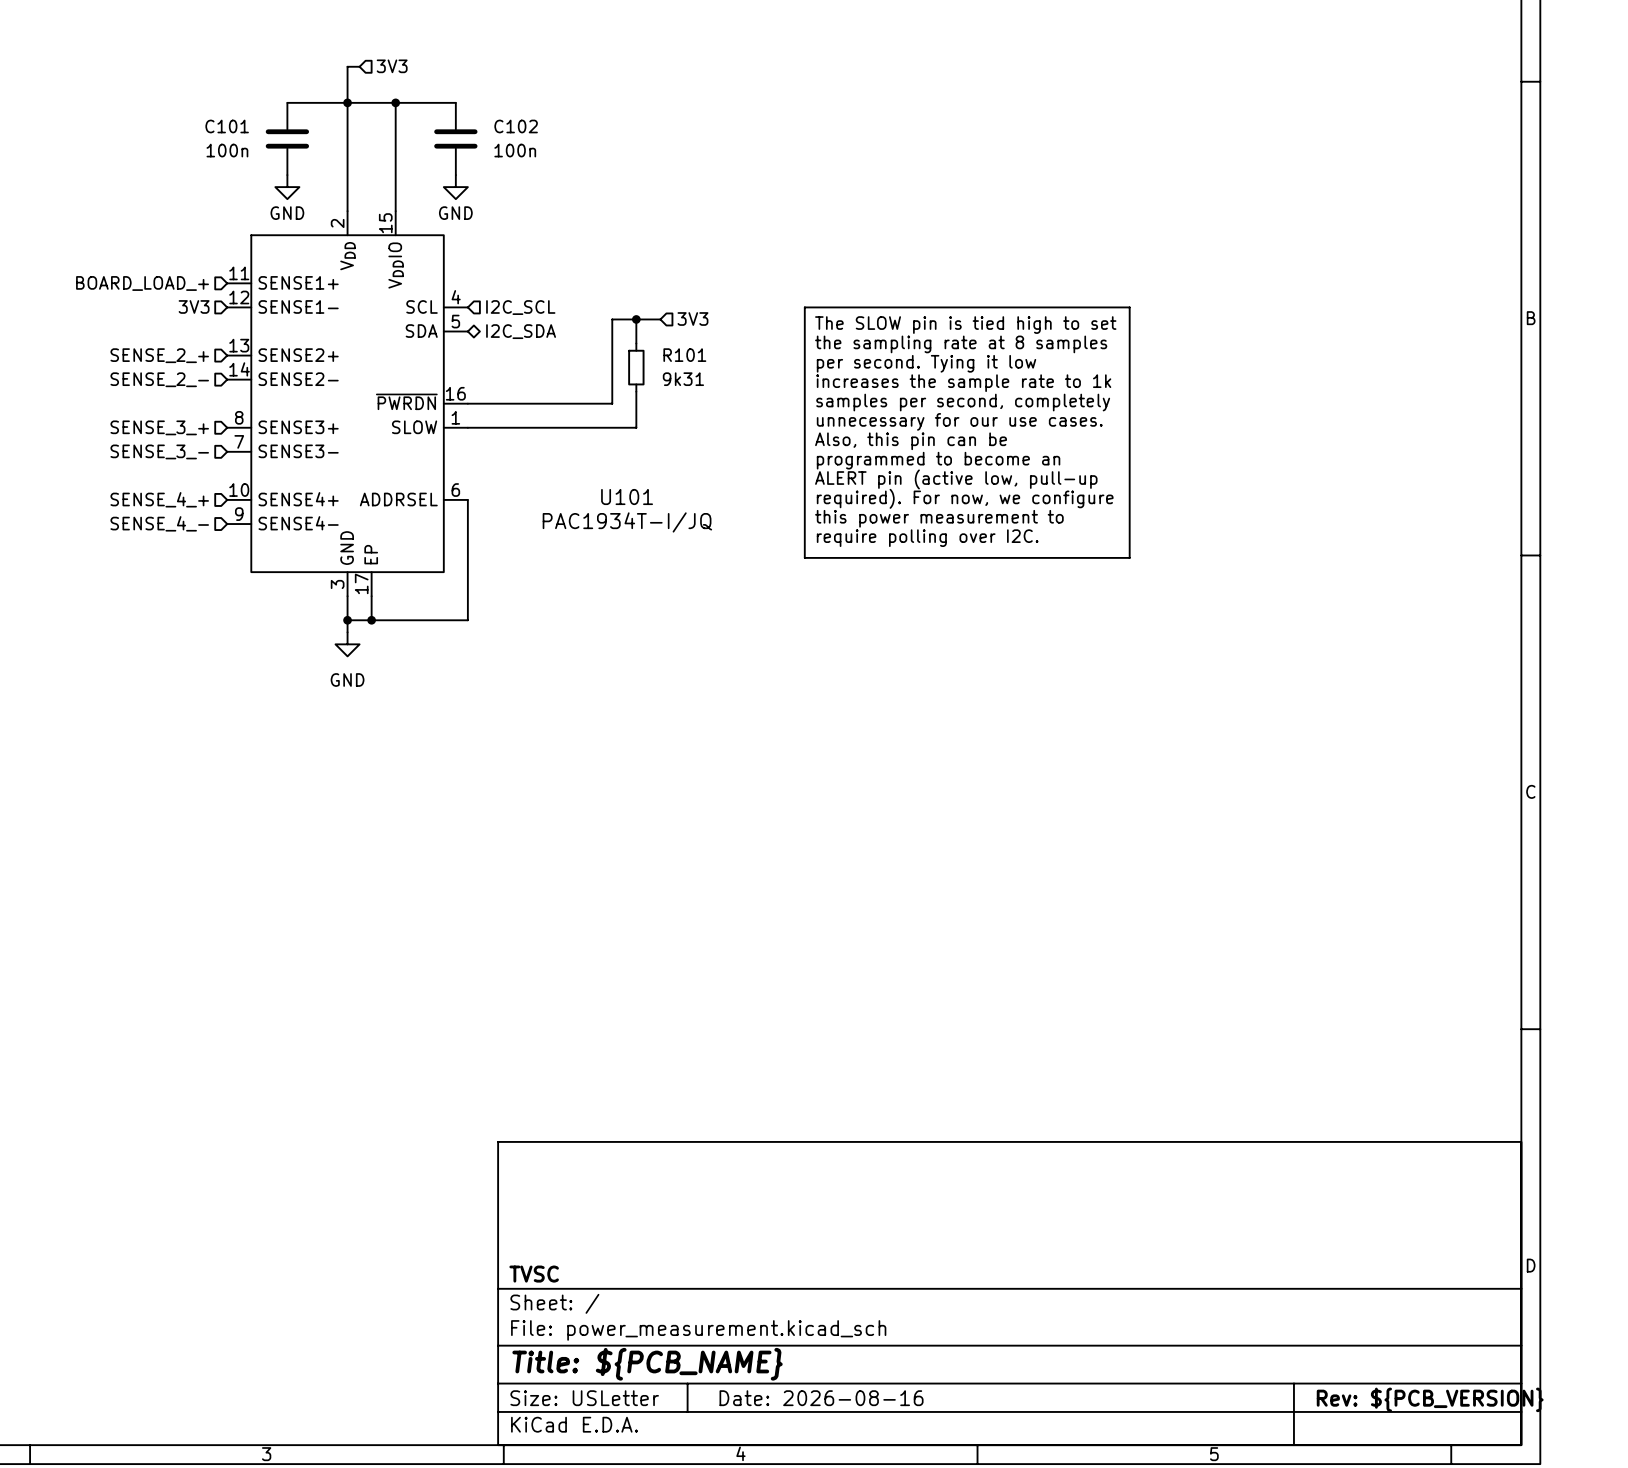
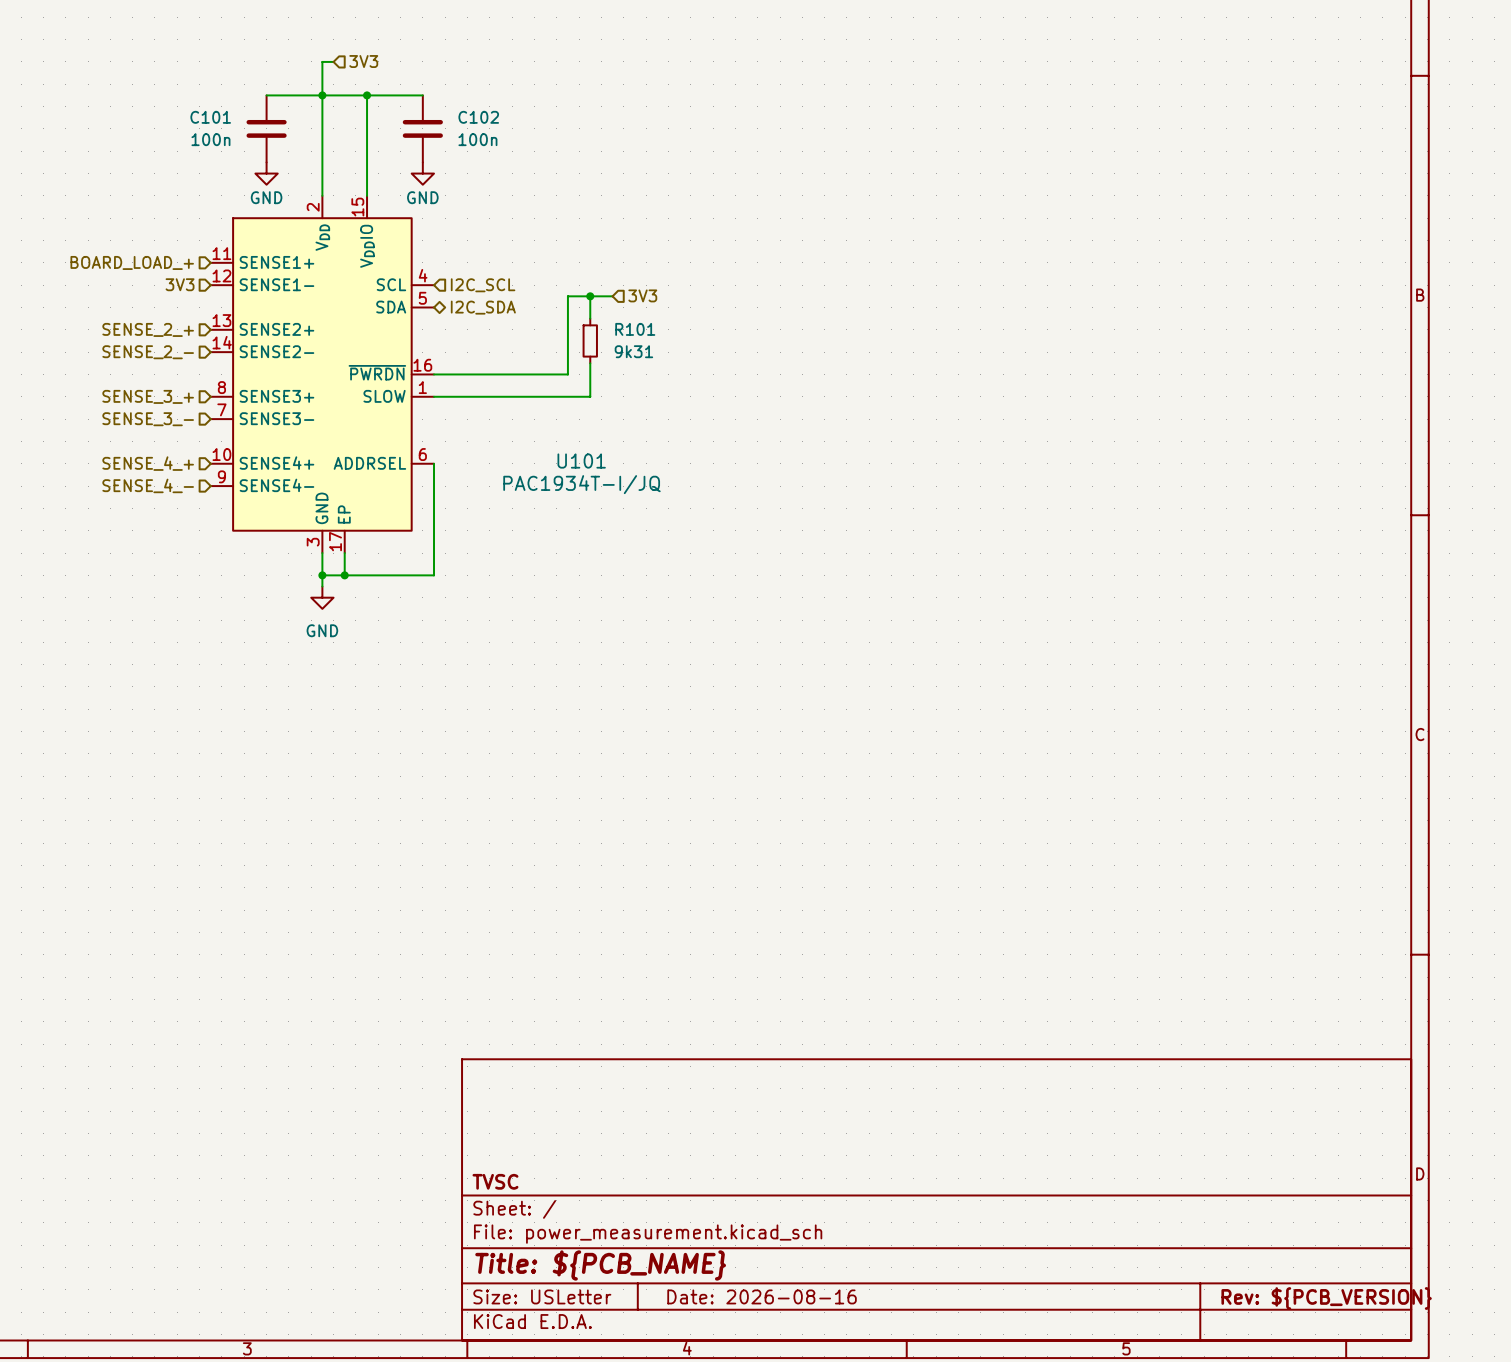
line: (804, 307) (1129, 307) (1129, 557) (804, 557) (804, 307) -> none
text: The SLOW pin is tied high to set (965, 325) -> none
text: the sampling rate at 8 samples (961, 344) -> none
text: per second. Tying it low (926, 363) -> none
text: increases the sample rate to 1k (963, 383) -> none
text: samples per second, completely (963, 402) -> none
text: unnecessary for our use cases. (959, 421) -> none
text: Also, this pin can be (911, 441) -> none
text: programmed to become an (938, 460) -> none
text: ALERT pin (active low, pull-up (956, 479) -> none
text: required). For now, we configure (965, 498) -> none
text: this power measurement to (939, 518) -> none
text: require polling over I2C. (927, 538) -> none

